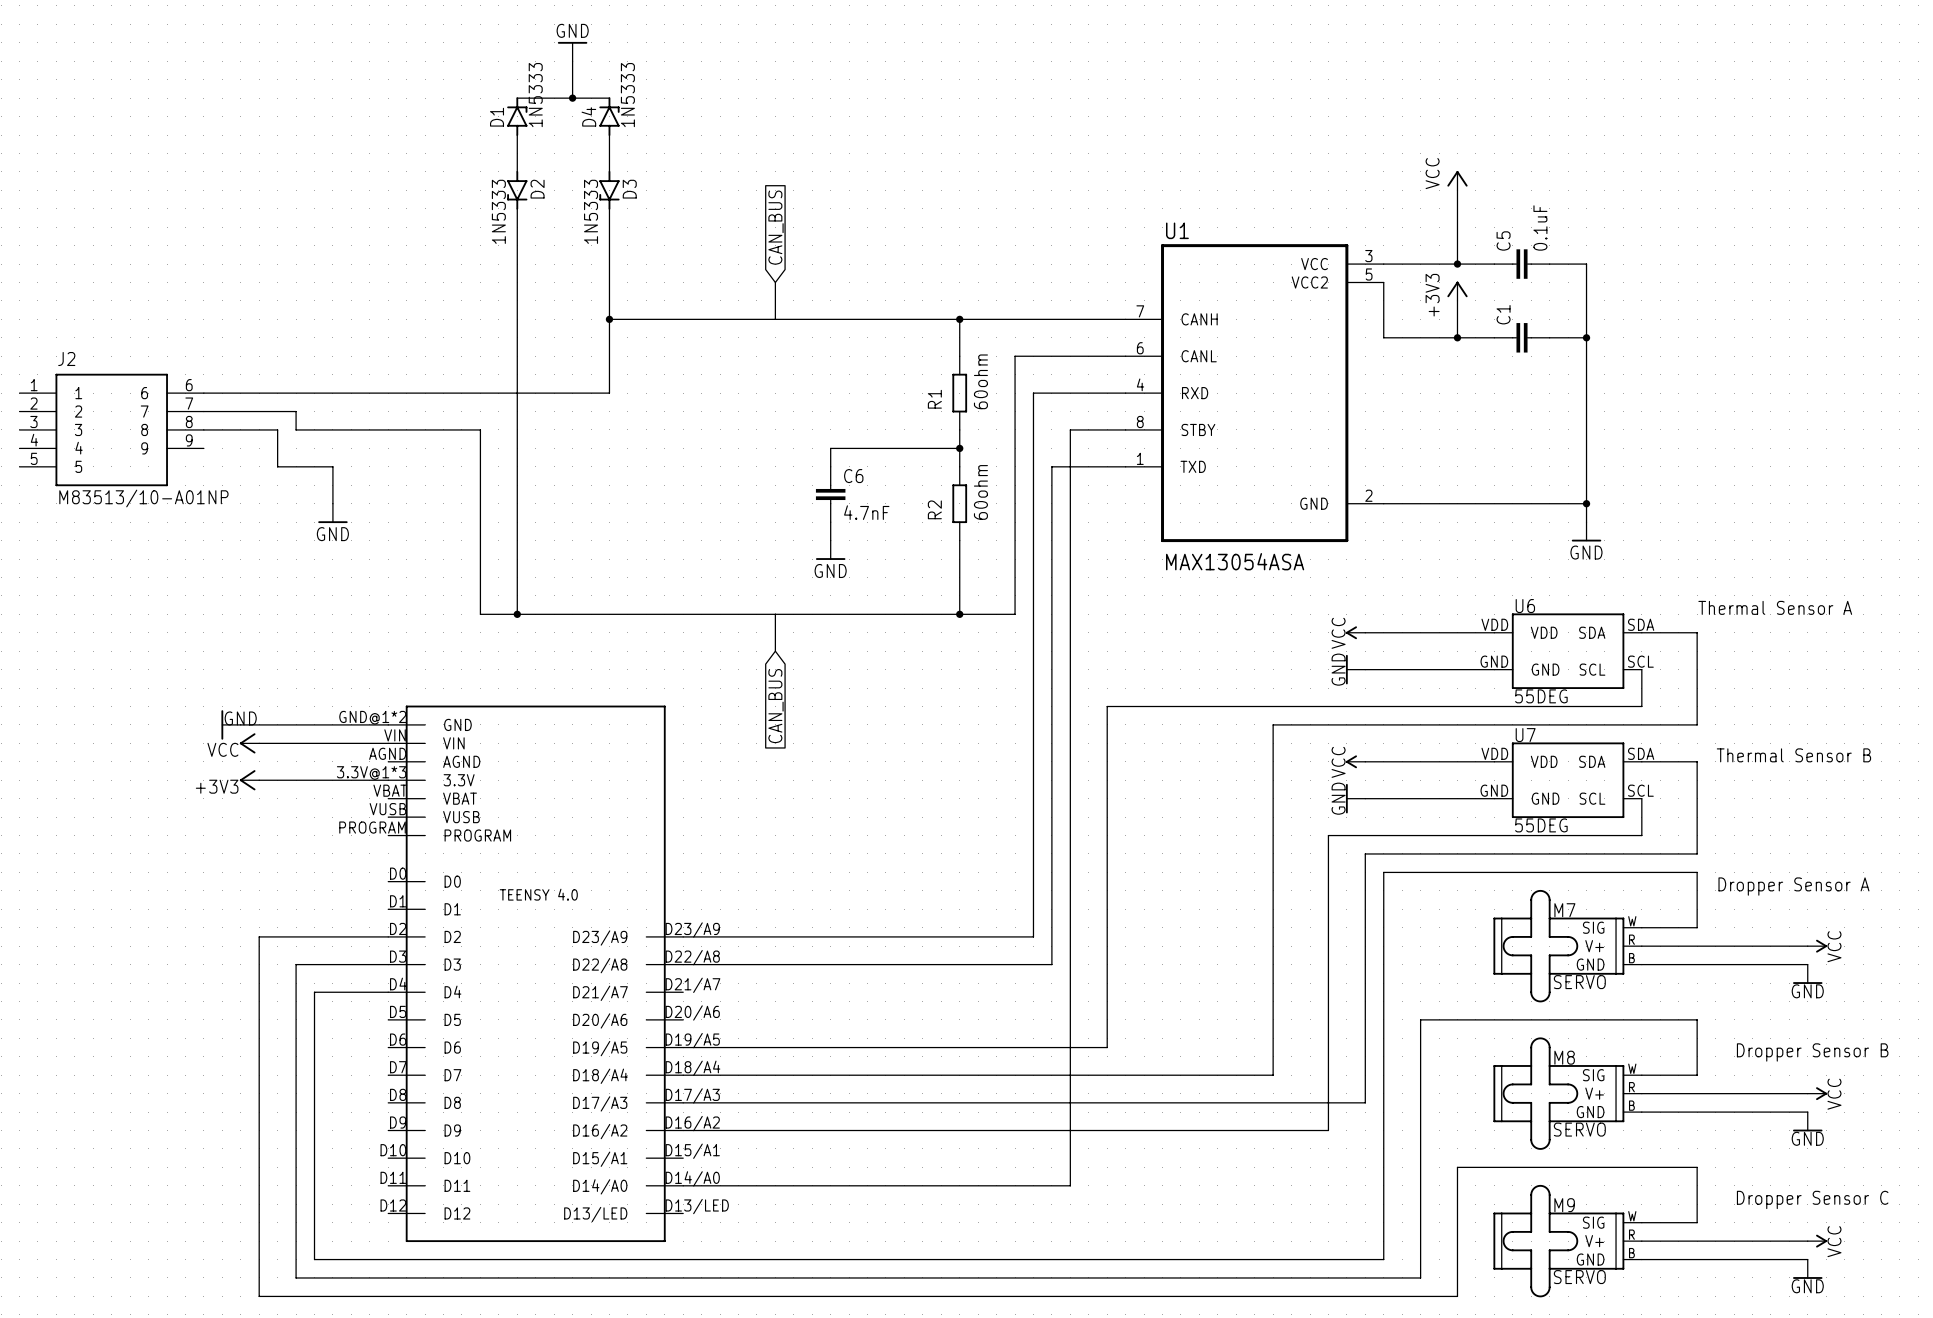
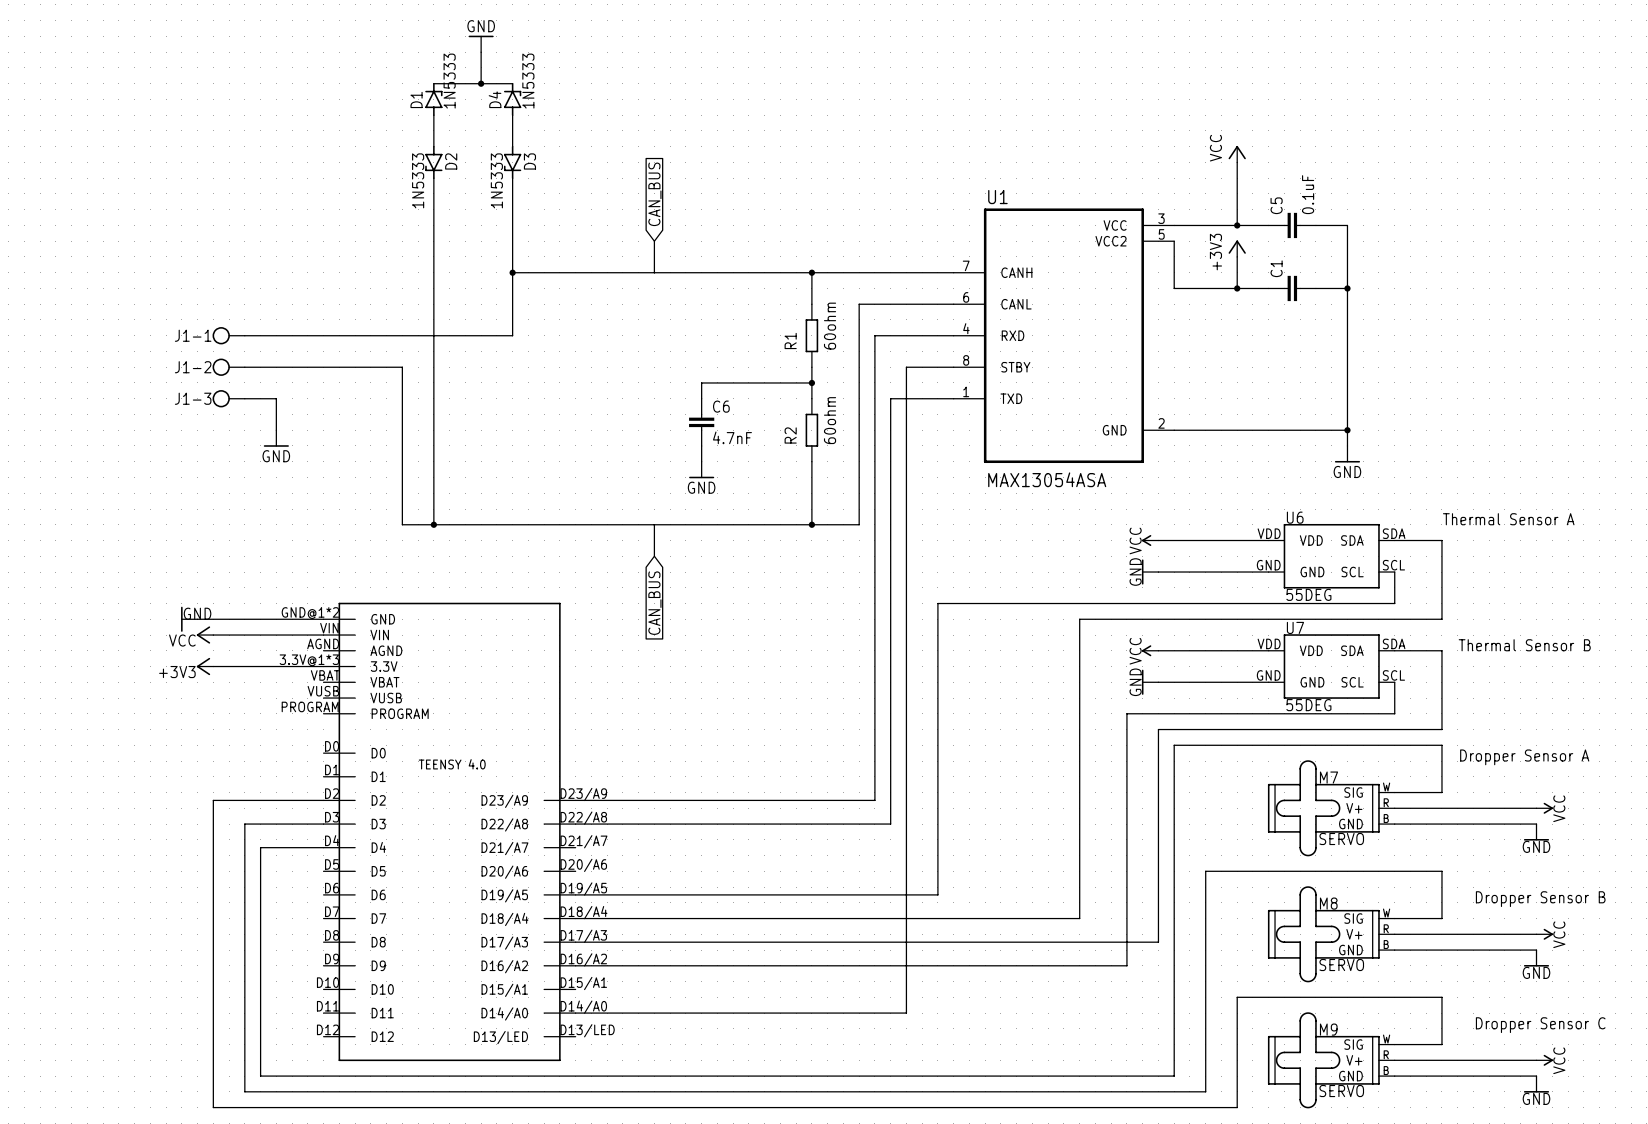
wire: (203, 393) (296, 393) -> none
J1-1: none -> (228, 335)
wire: (203, 411) (296, 411) (296, 429) -> none
J2: M83513/10-A01NP (111, 429) -> none
wire: (203, 429) (277, 429) (277, 466) (296, 466) -> none
J1-2: none -> (228, 367)
J1-3: none -> (228, 398)

